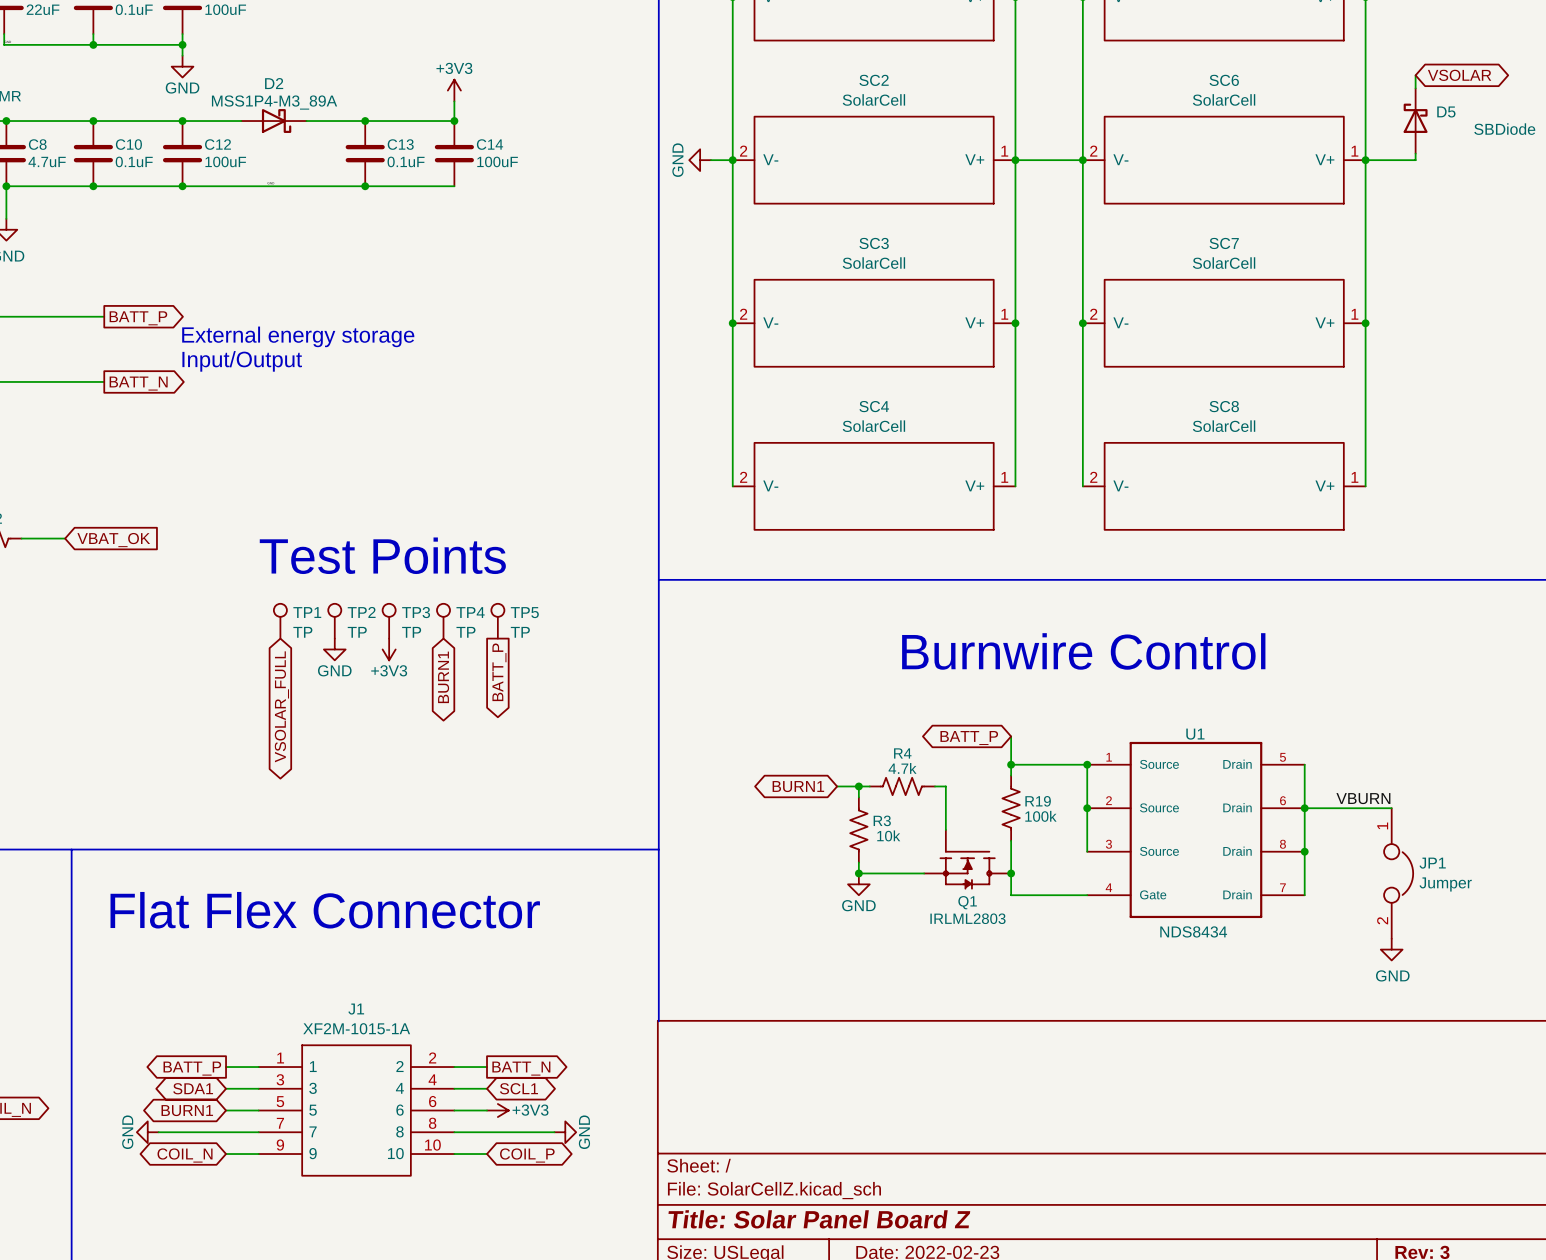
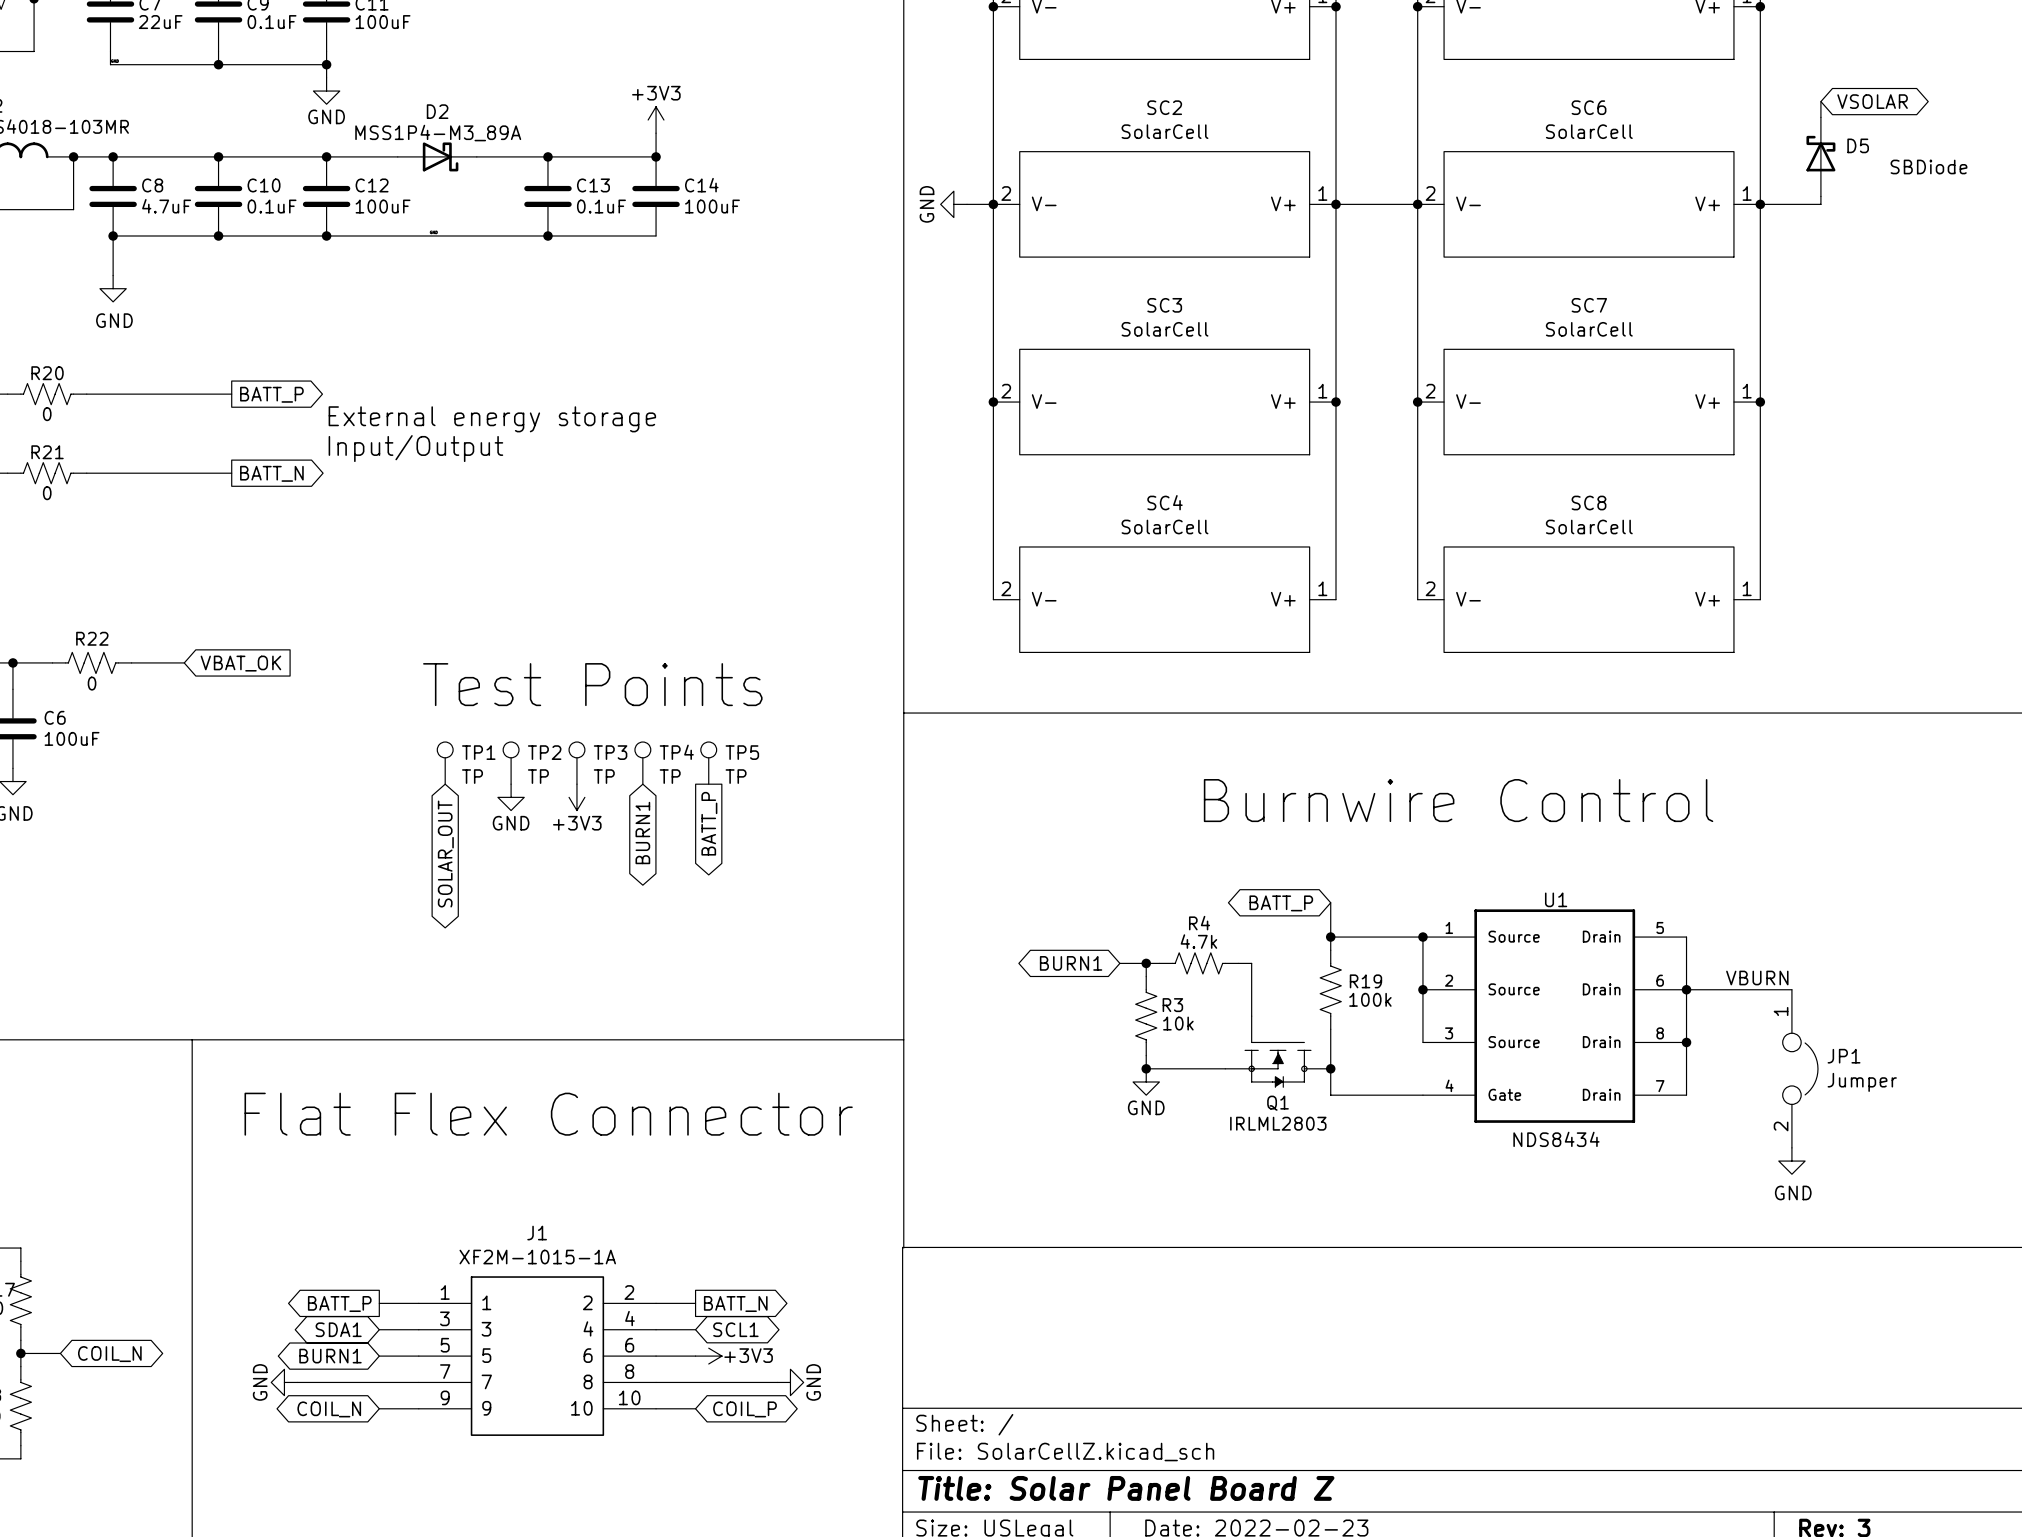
global label: VSOLAR_FULL (281, 706) -> SOLAR_OUT (445, 854)

